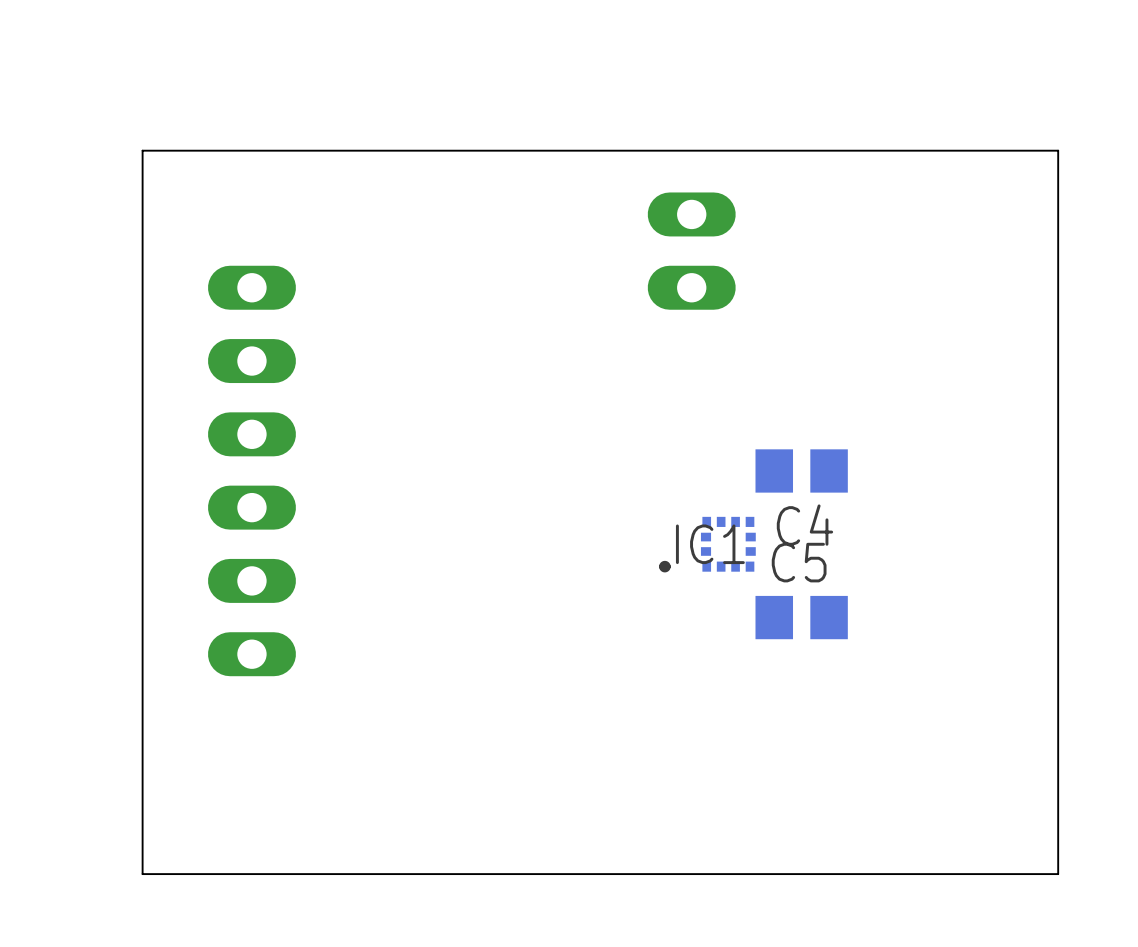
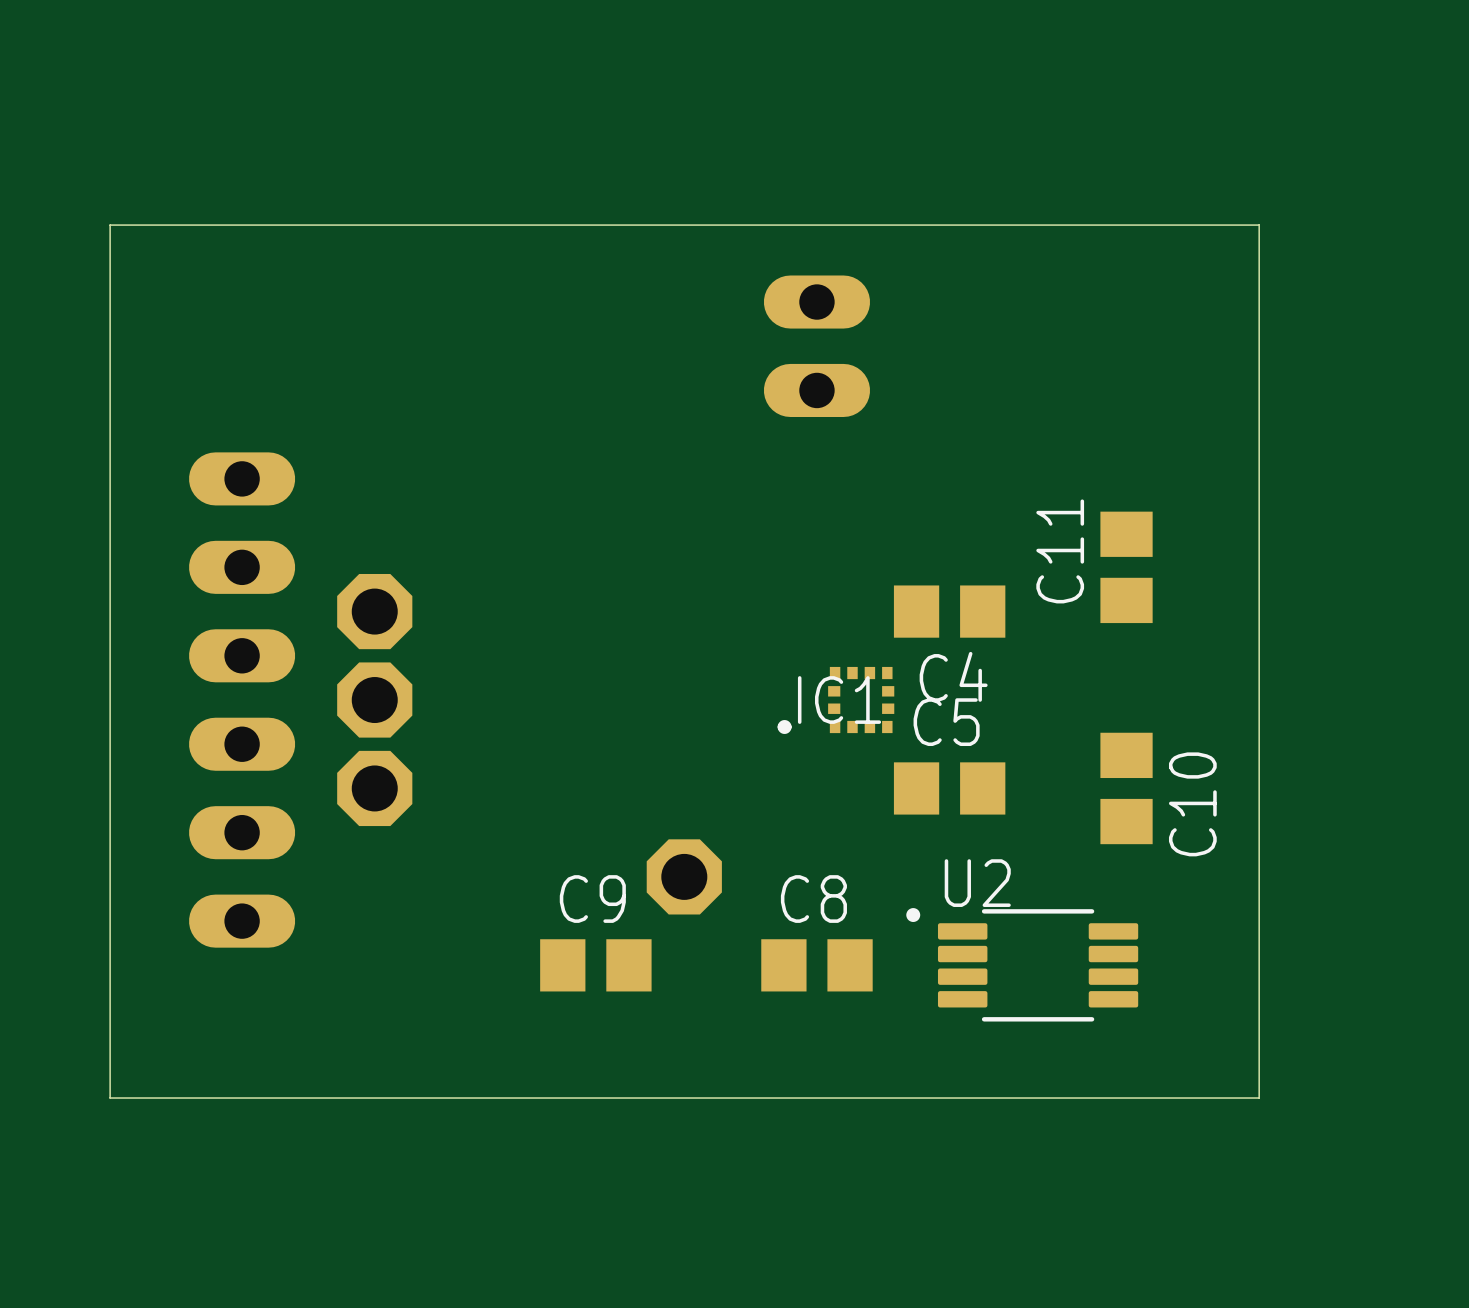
board edge: (142, 150) (142, 874) -> (154, 225) (110, 225) (110, 1098) (154, 1098)
C11: none -> (1126, 567)
part position: (251, 470) -> (242, 700)
part: none -> (374, 611)
part: none -> (374, 700)
part: none -> (374, 788)
C10: none -> (1126, 788)
part: none -> (684, 876)
U2: none -> (1022, 964)
C9: none -> (595, 965)
C8: none -> (816, 965)

